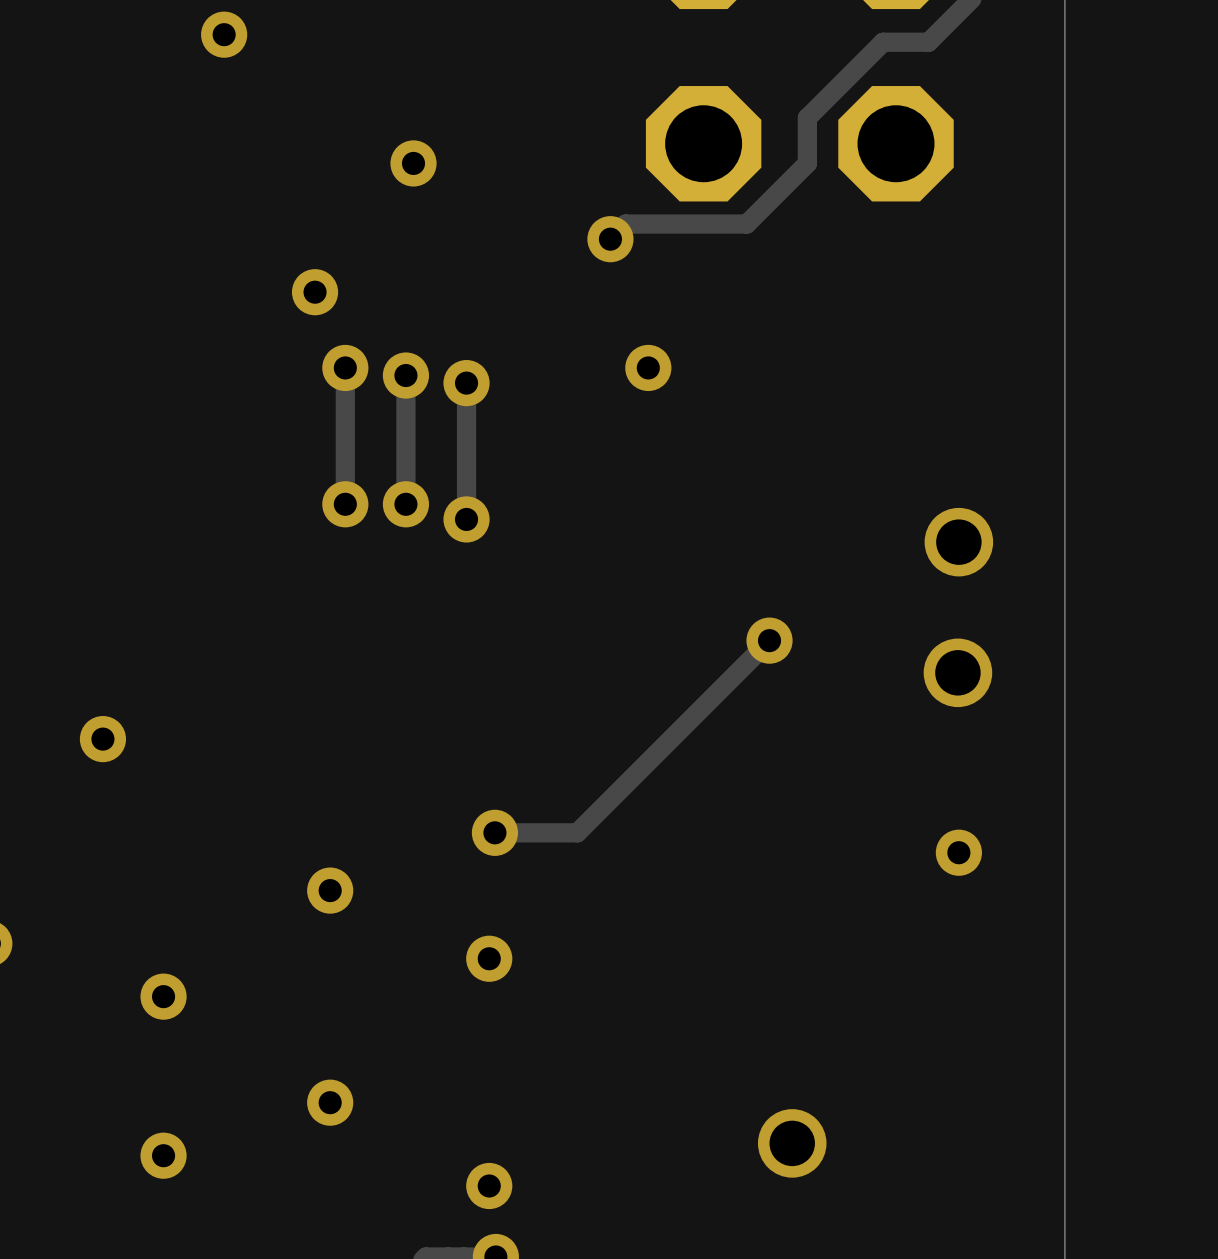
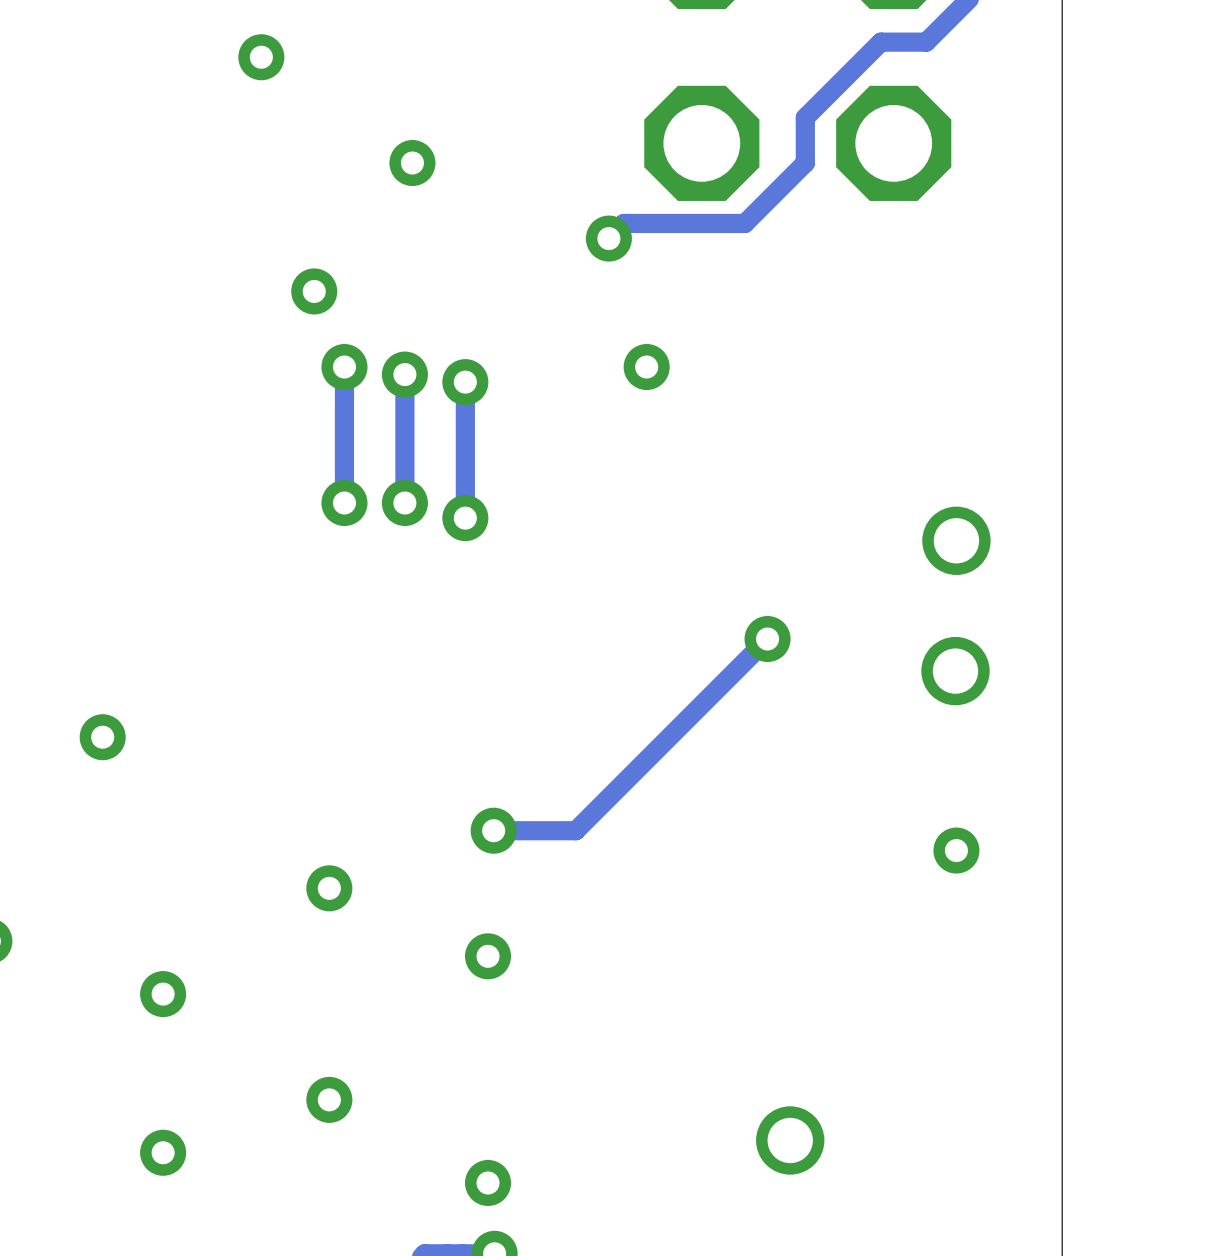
via position: (224, 34) -> (261, 57)

